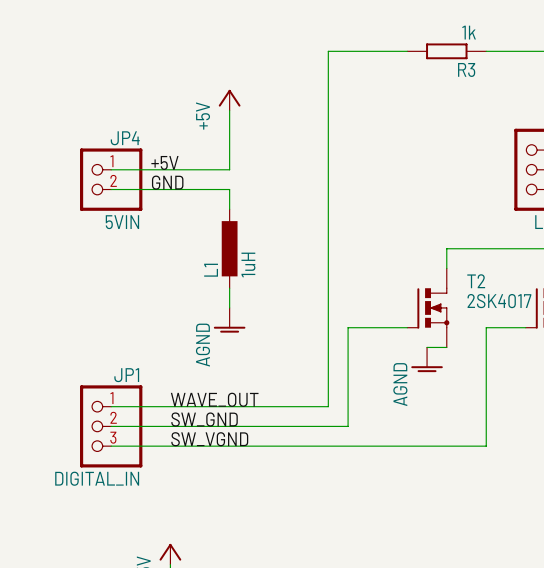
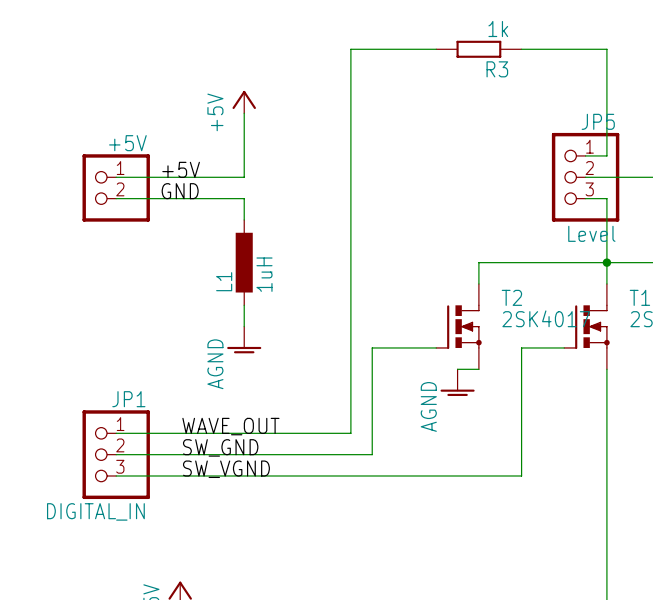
JP4 name: JP4 (125, 138) -> +5V (127, 143)
JP4 value: 5VIN (122, 222) -> none

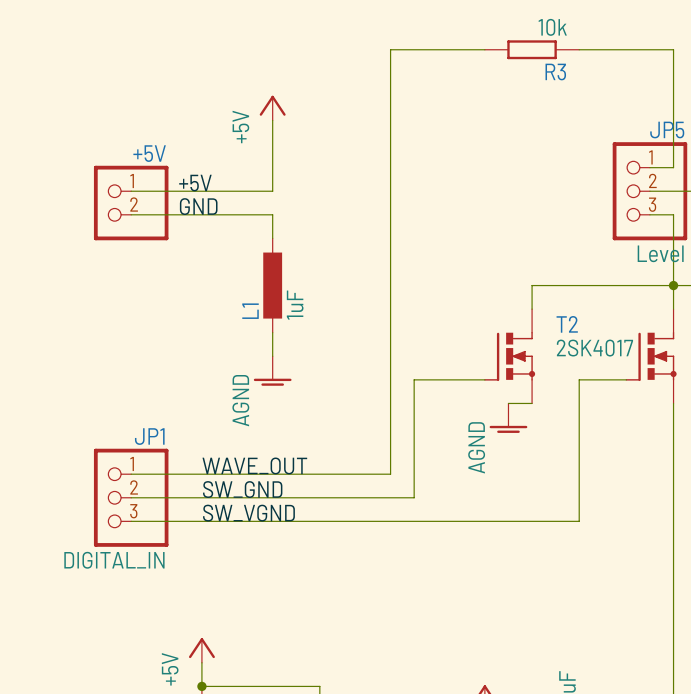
R3 value: 1k (498, 29) -> 10k (552, 27)
L1 value: 1uH (264, 274) -> 1uF (295, 305)

